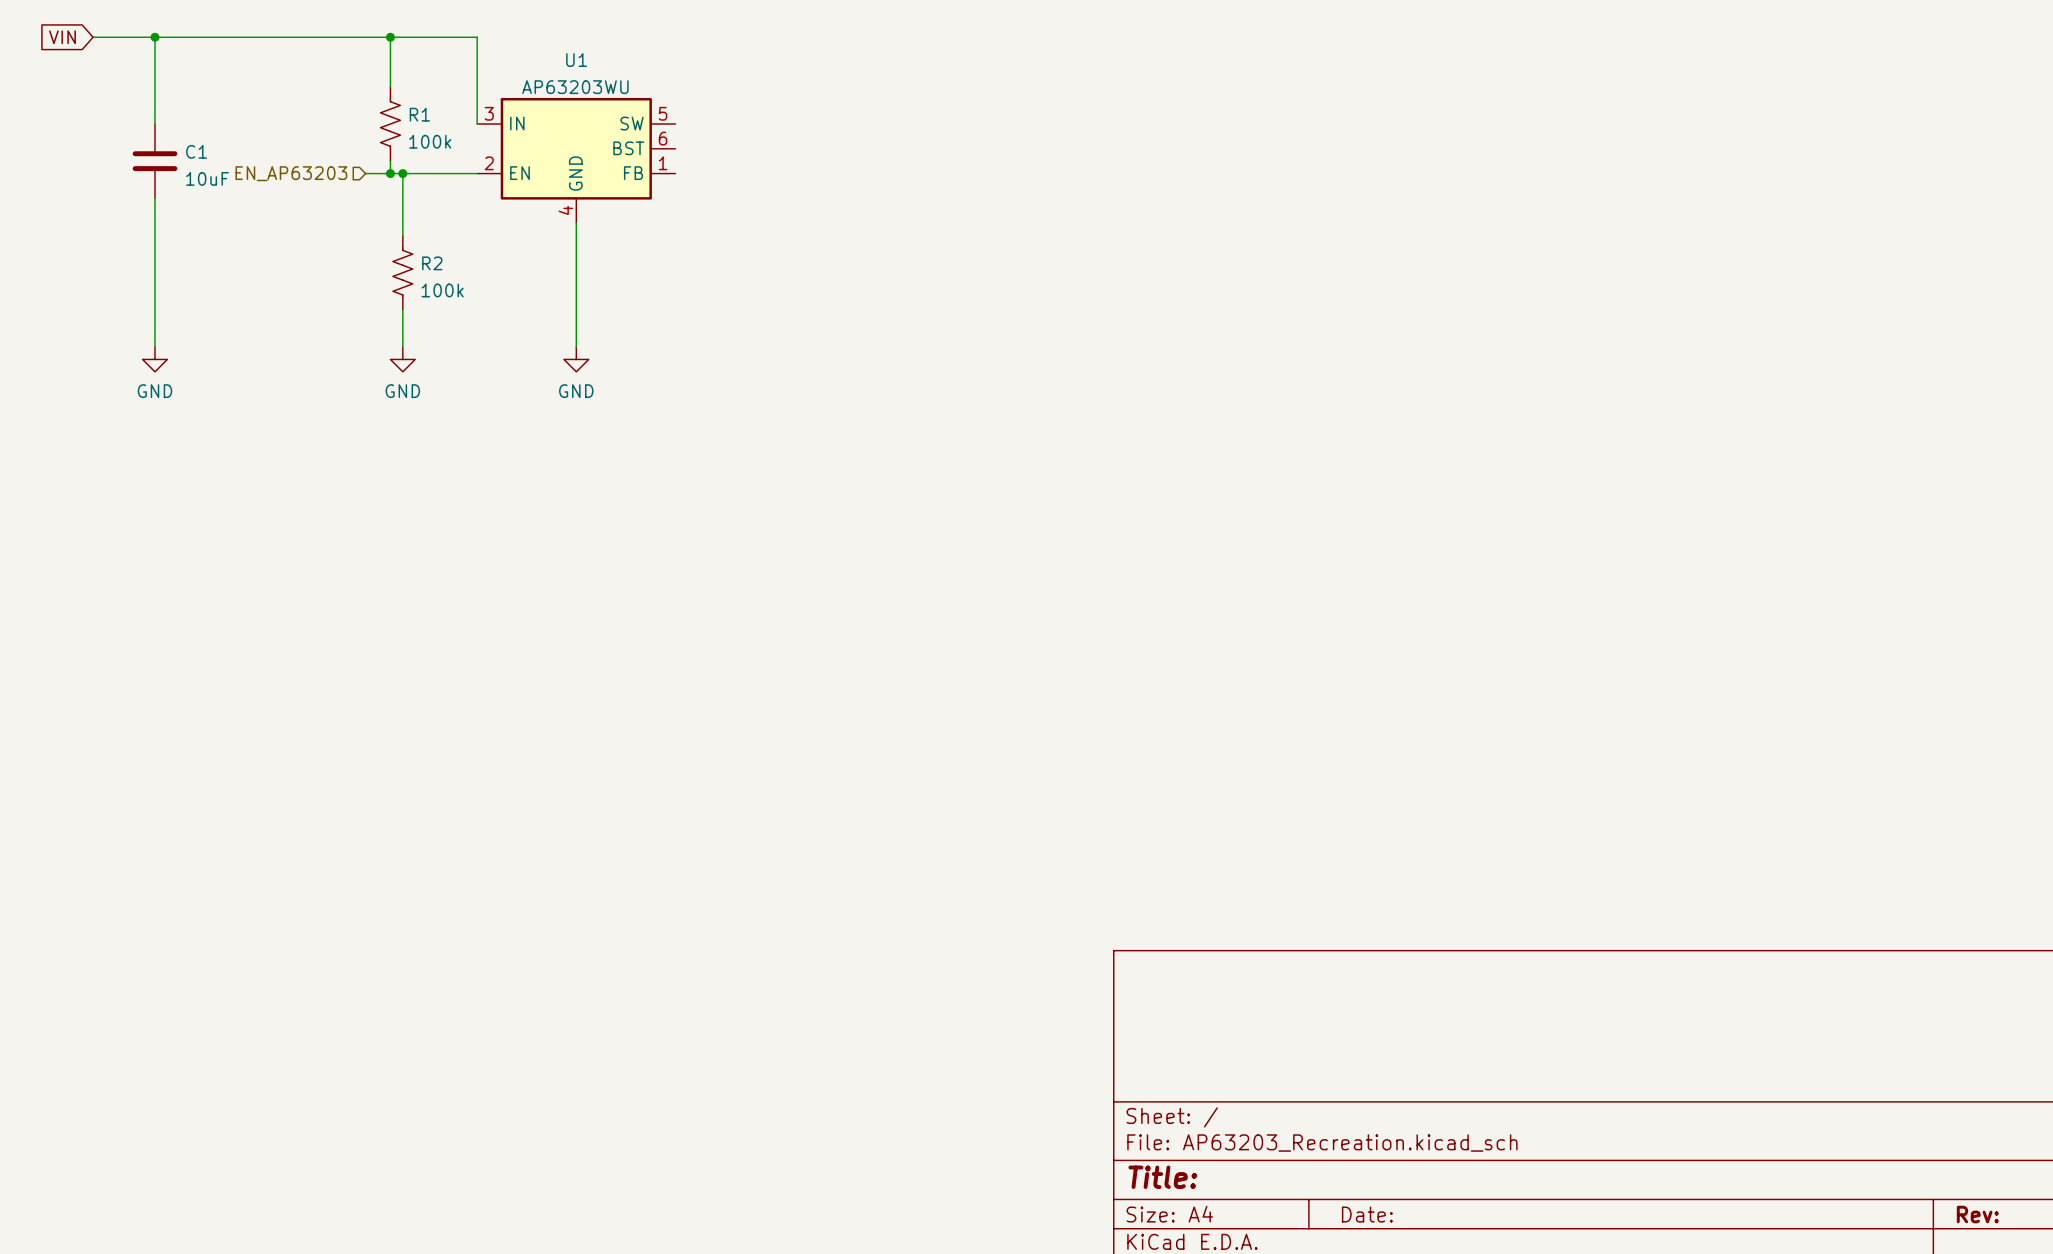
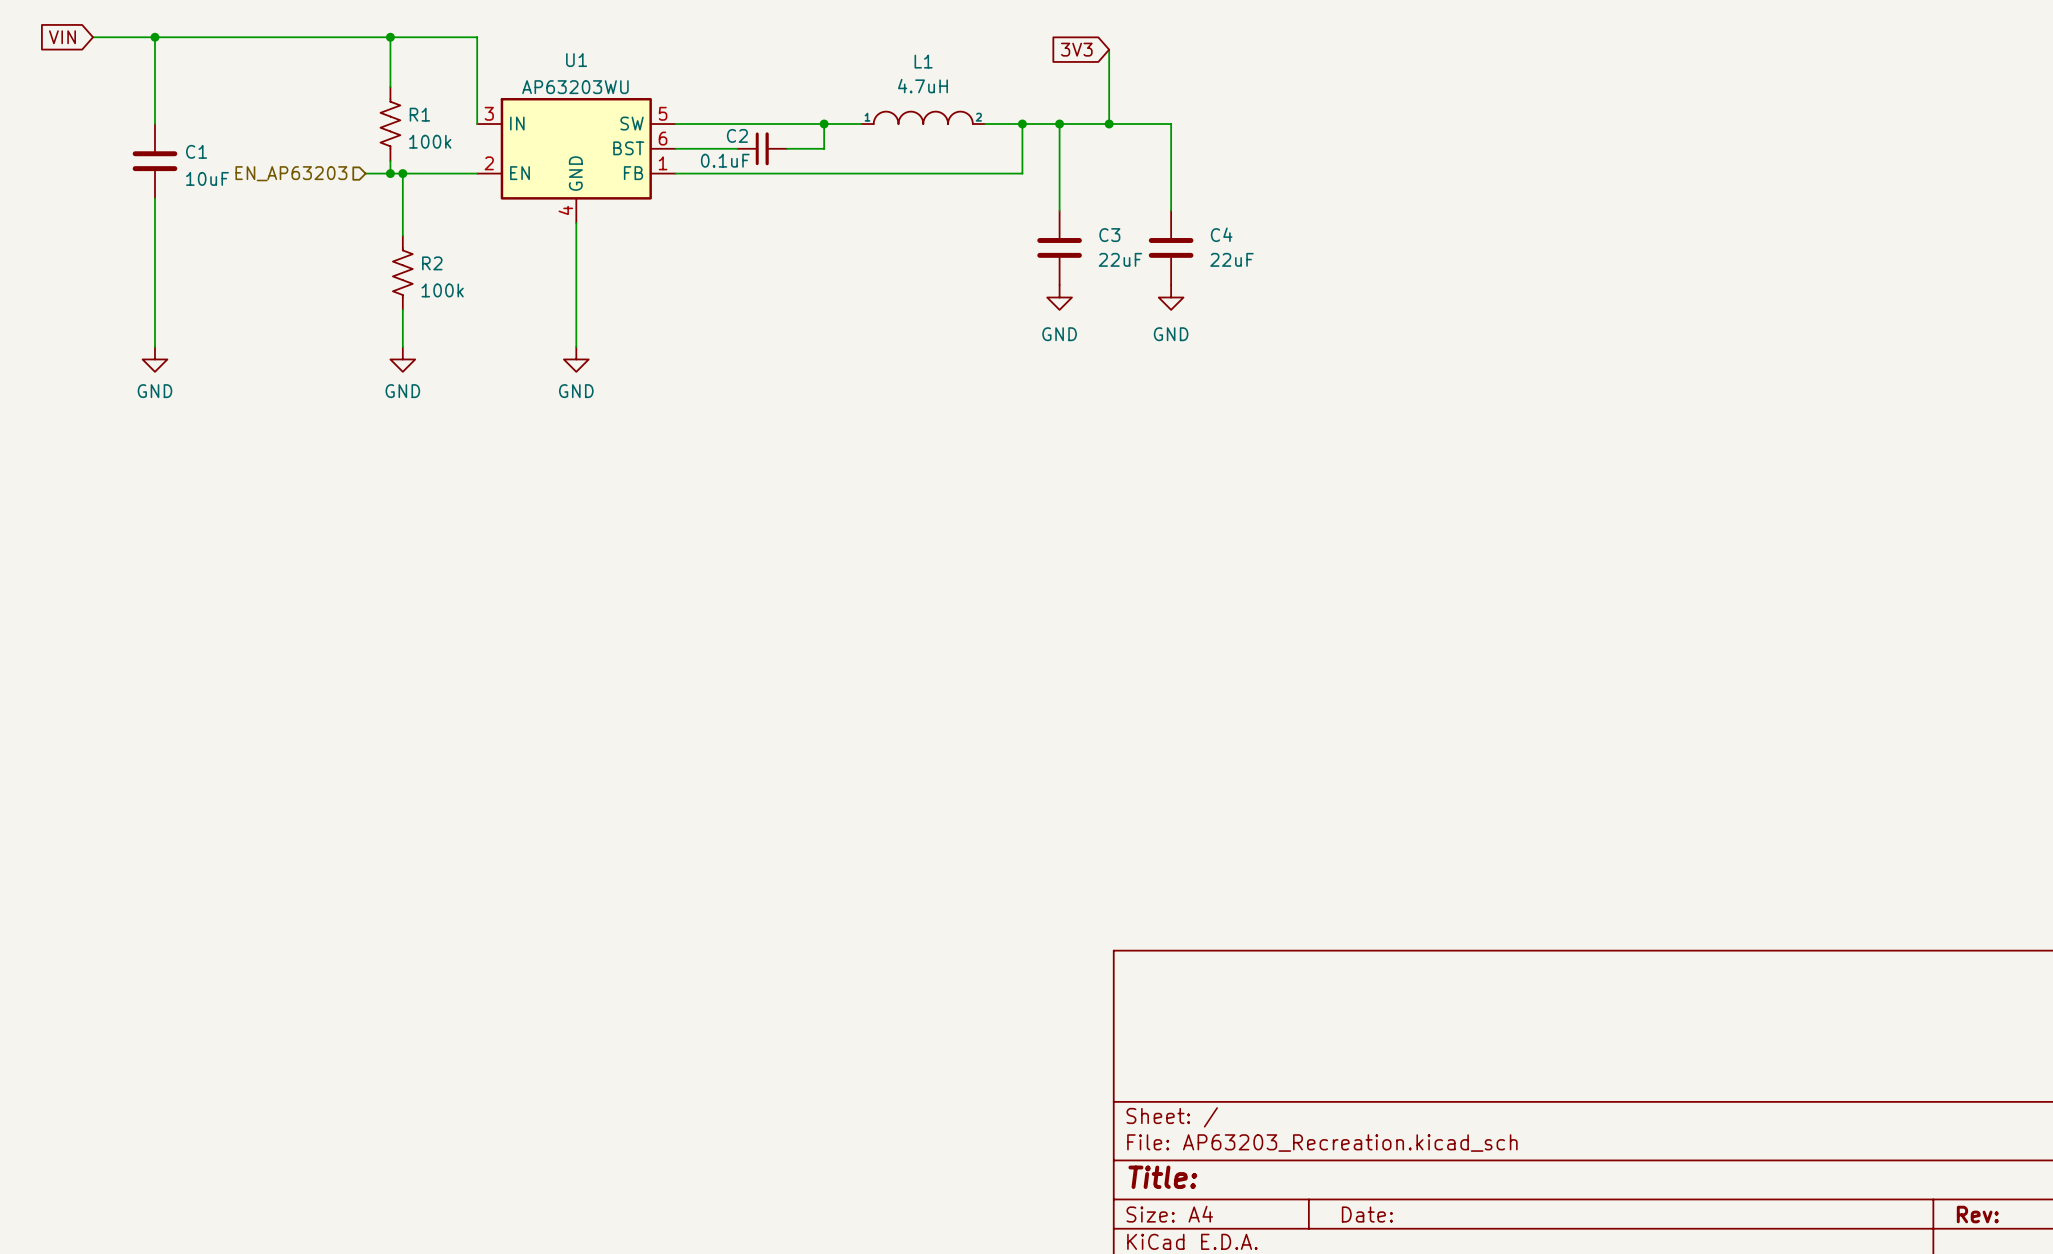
global label: none -> 3V3 (1076, 49)
wire: none -> (1109, 49) (1109, 124)
L1: none -> 4.7uH (923, 117)
wire: none -> (675, 124) (861, 124)
wire: none -> (824, 124) (824, 148) (786, 148)
junction: none -> (824, 124)
wire: none -> (985, 124) (1171, 124) (1171, 210)
wire: none -> (1022, 124) (1022, 173) (675, 173)
junction: none -> (1022, 124)
wire: none -> (1059, 124) (1059, 210)
junction: none -> (1059, 124)
junction: none -> (1109, 124)
wire: none -> (675, 148) (737, 148)
C2: none -> 0.1uF (762, 148)
C3: none -> 22uF (1059, 247)
C4: none -> 22uF (1171, 247)
power symbol: none -> GND (1059, 297)
power symbol: none -> GND (1171, 297)

